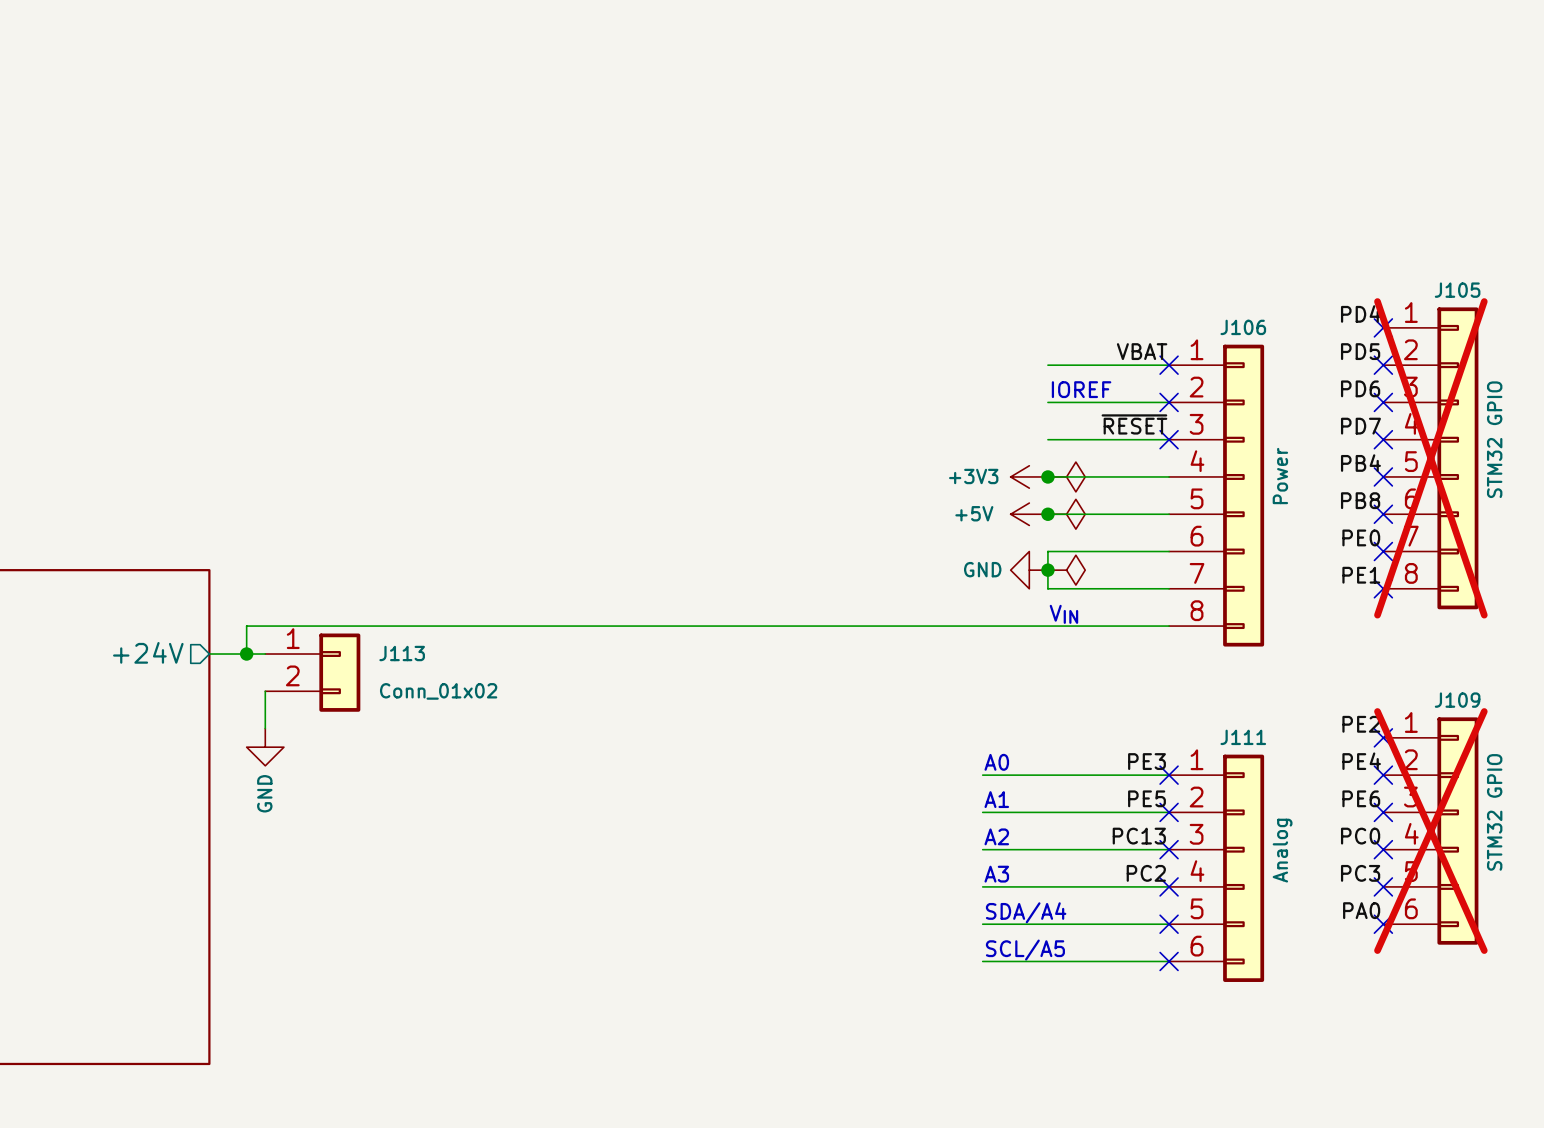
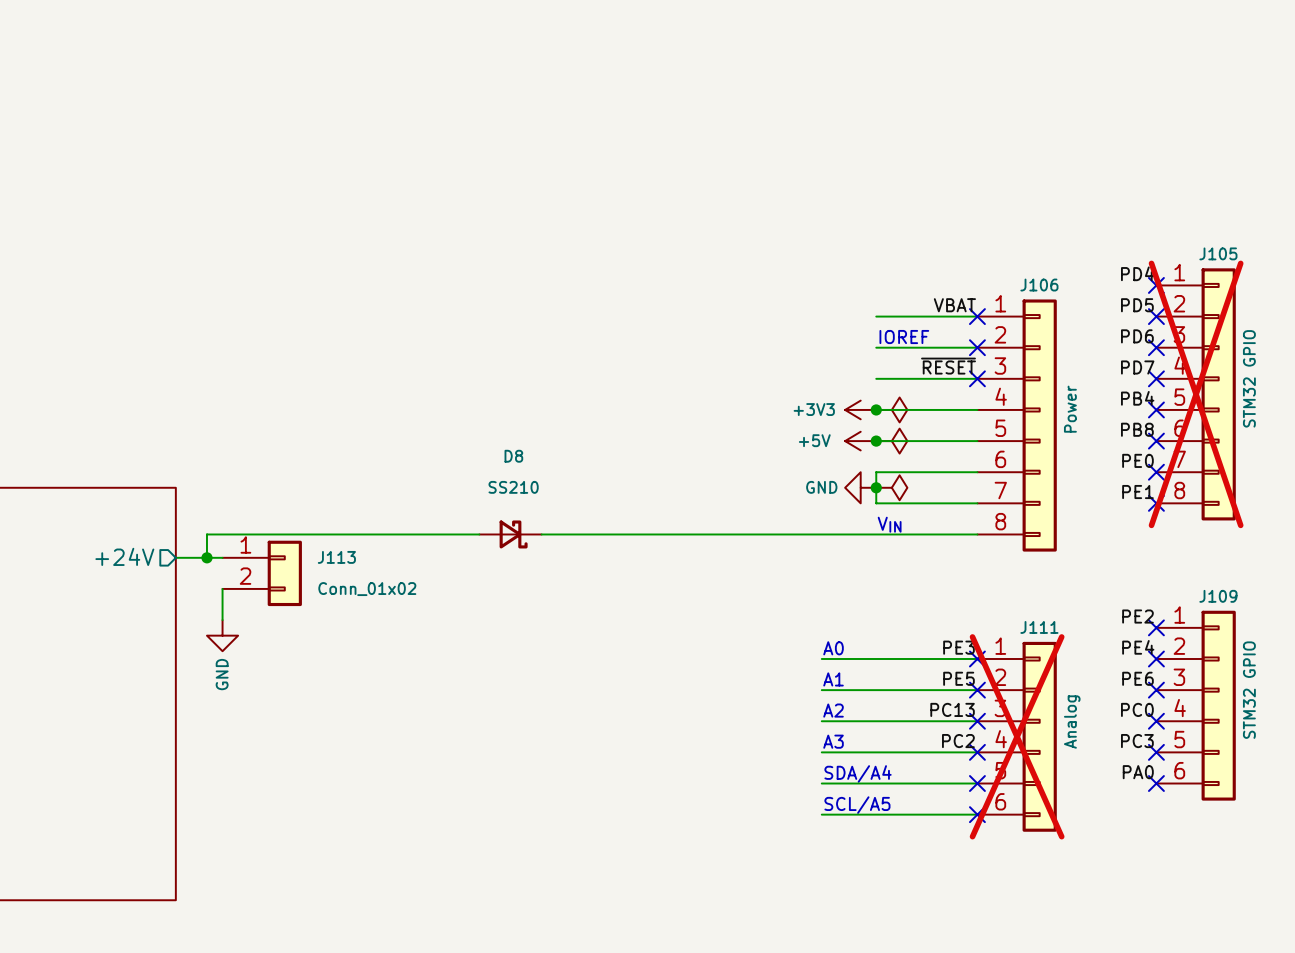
D8: none -> SS210 (510, 534)
J109 do-not-place cross: (1430, 831) -> none
J111 do-not-place cross: none -> (1017, 736)

